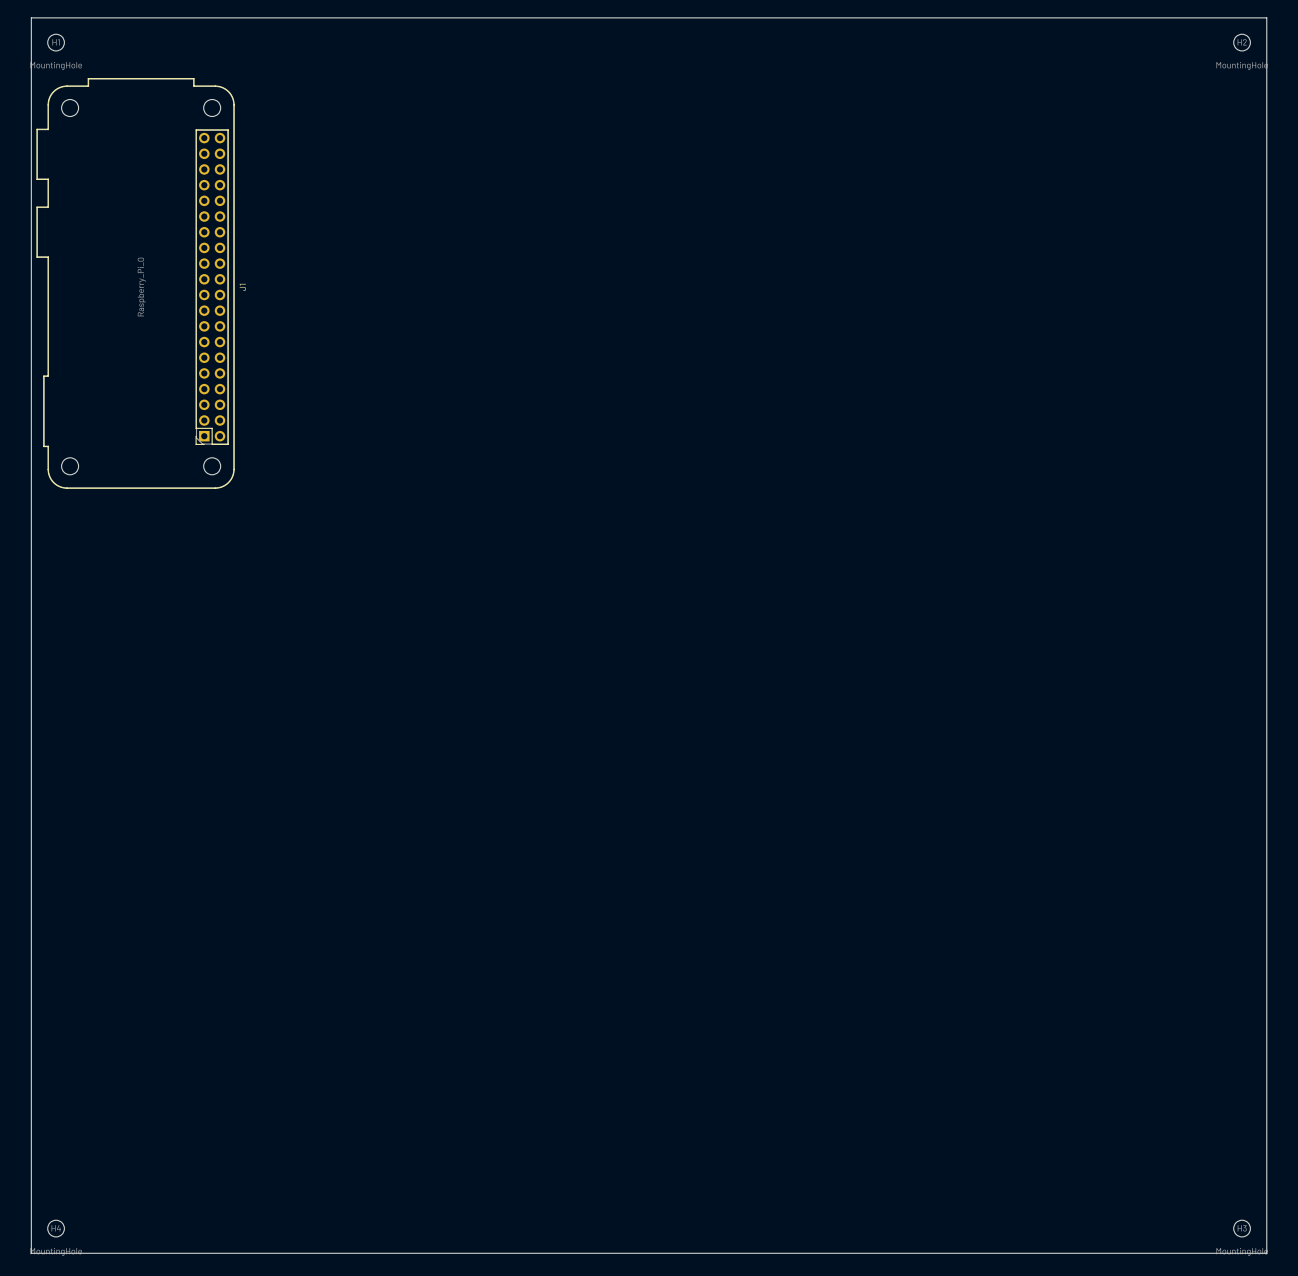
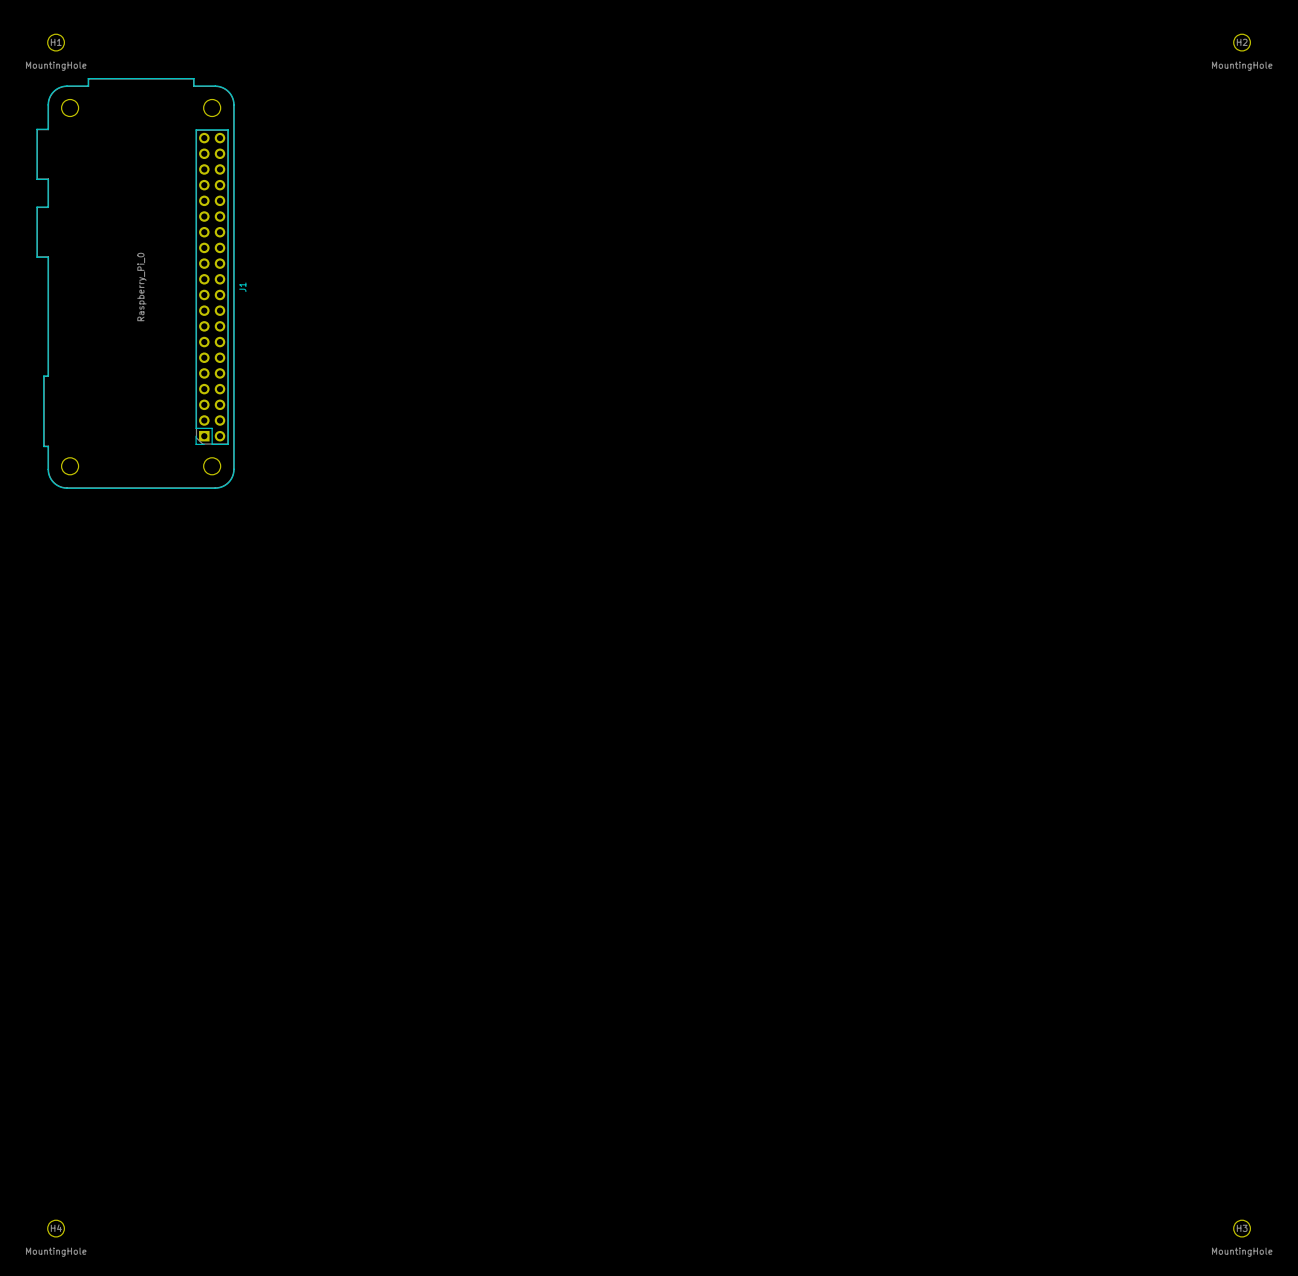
board edge: (31, 17) (1266, 17) (1266, 1253) (31, 1253) (31, 17) -> none

